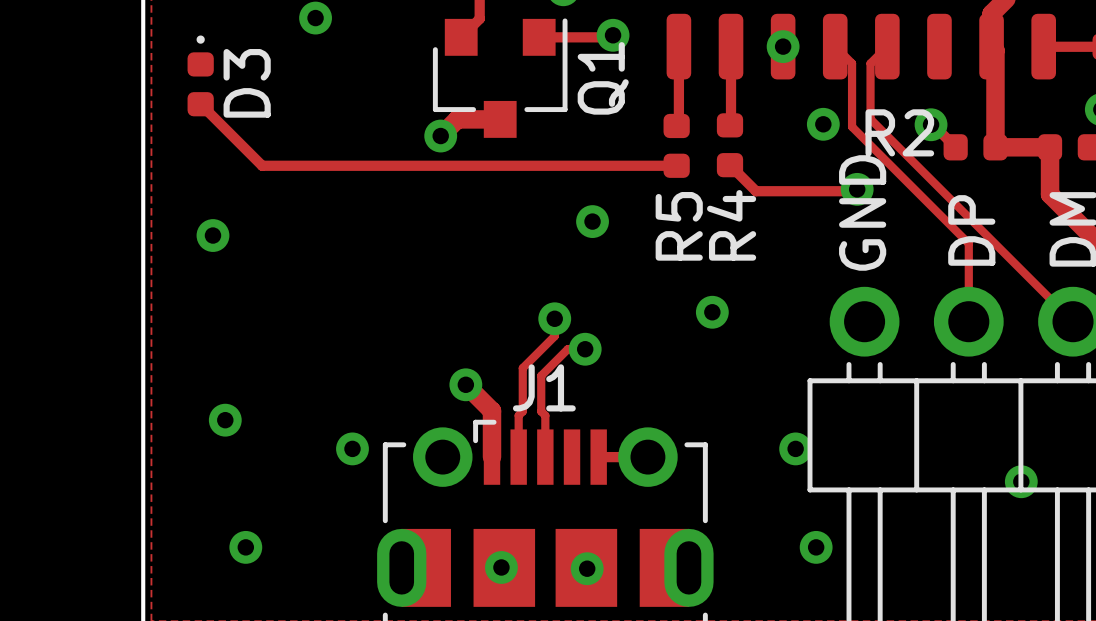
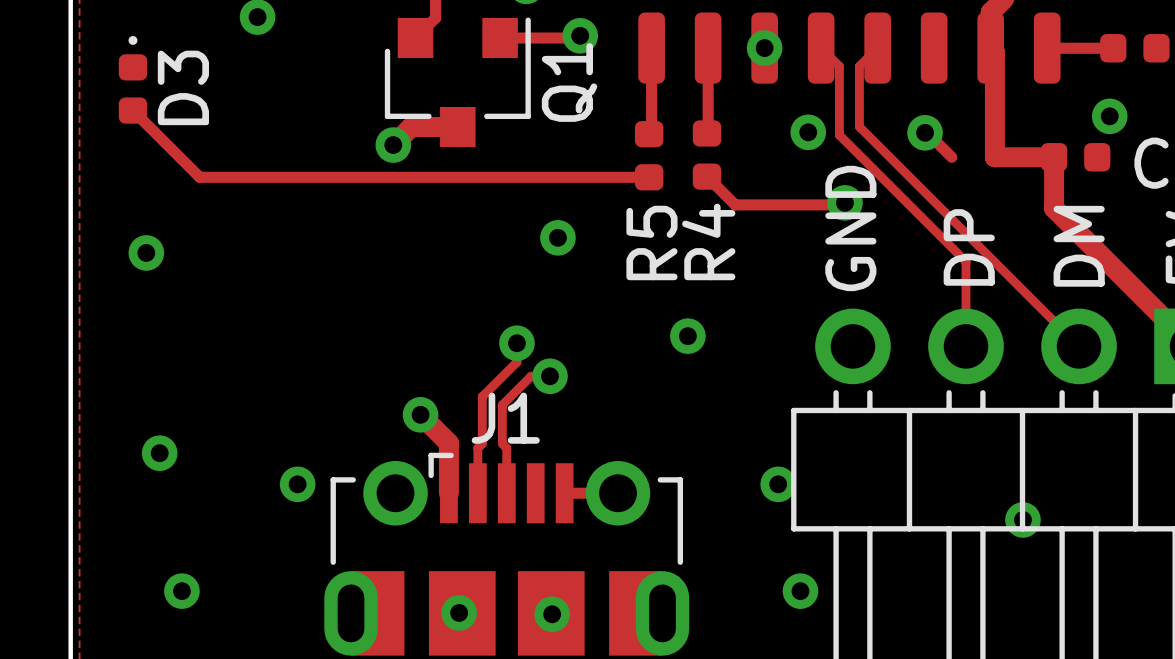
R2: (975, 147) -> none

